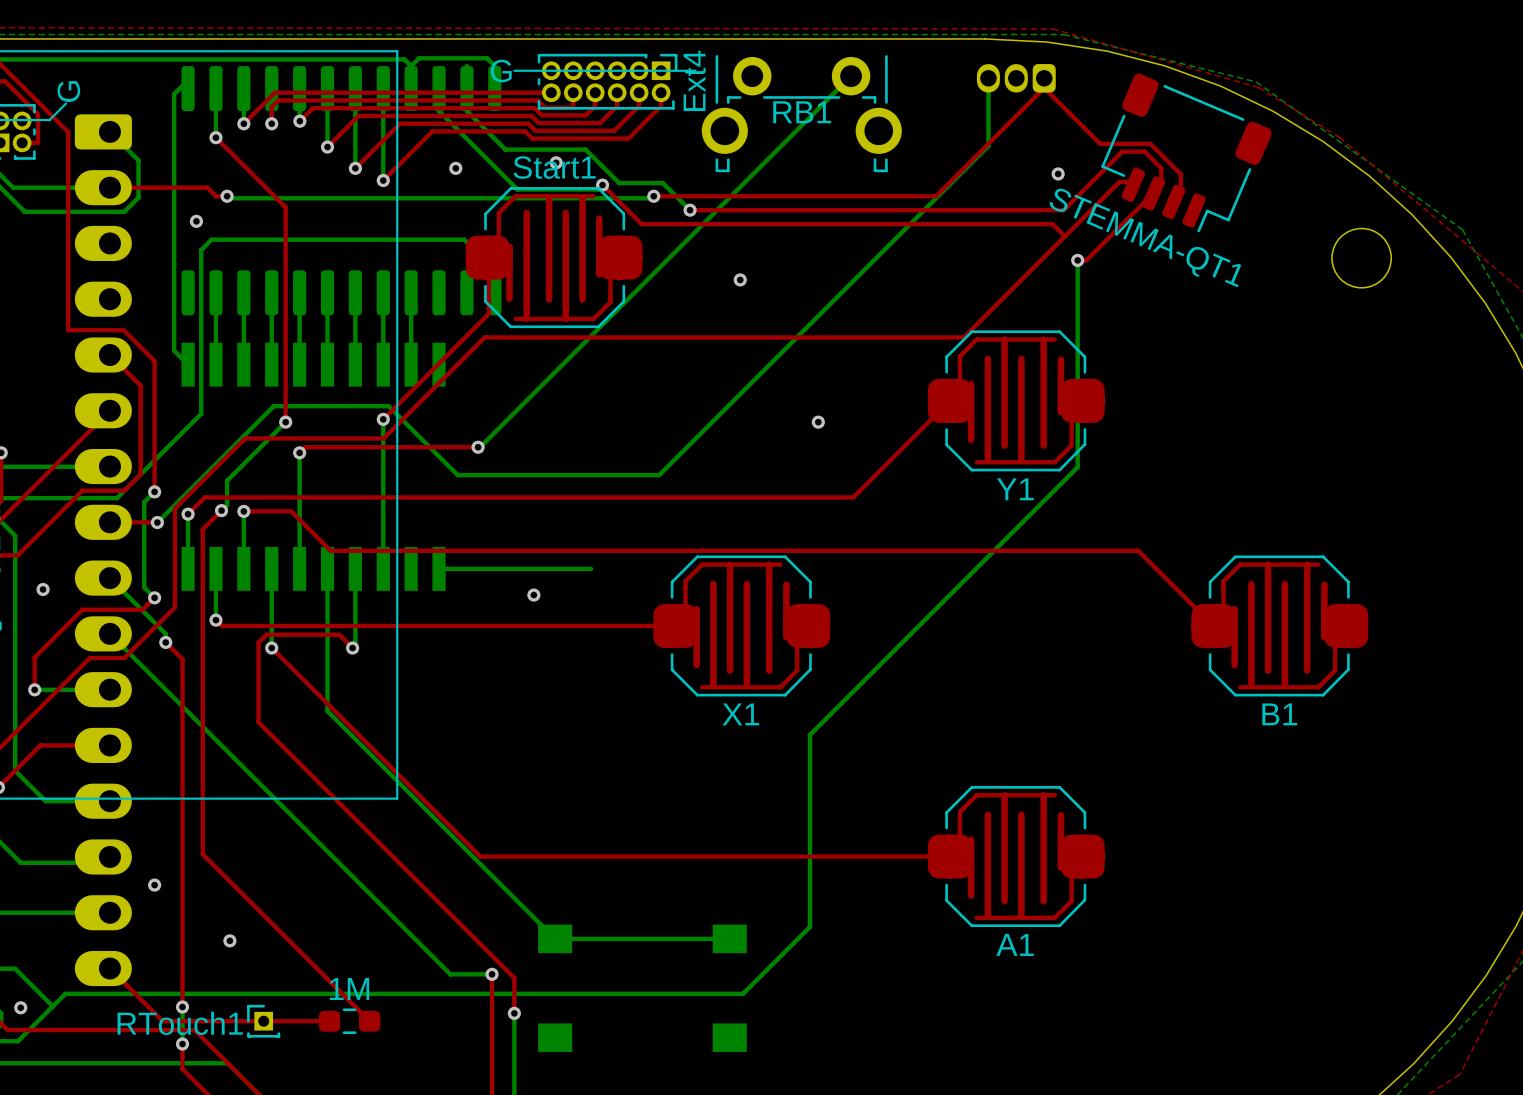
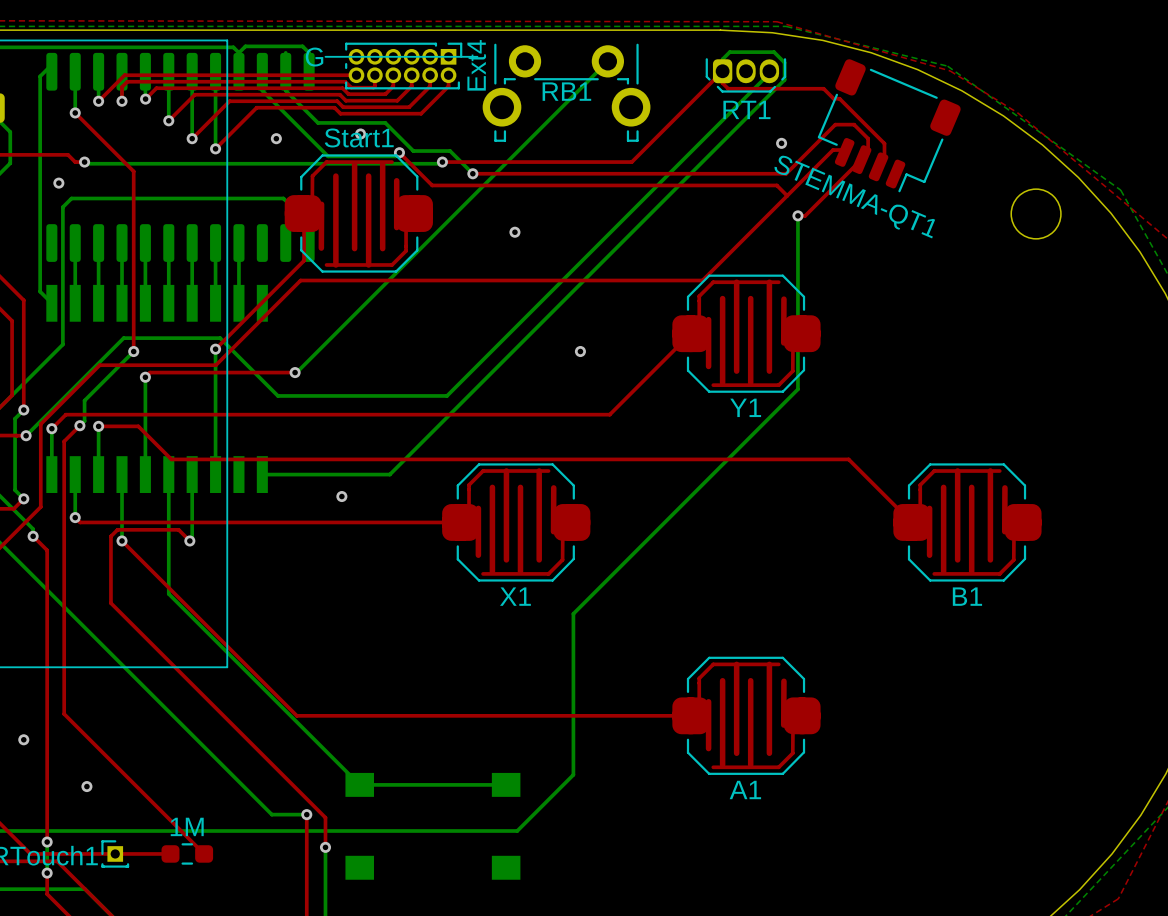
bottom track: none -> (722, 59) (729, 52) (774, 52) (784, 62) (784, 79) (389, 474)
RT1 side: bottom (1016, 78) -> top (745, 75)
bottom track: (988, 87) (988, 145) -> (769, 73) (723, 119)
top track: (1150, 143) (1100, 143) (1044, 87) (935, 196) (879, 196) -> (859, 118) (839, 98) (833, 98) (823, 88) (728, 88) (722, 83) (722, 71) (631, 162)

